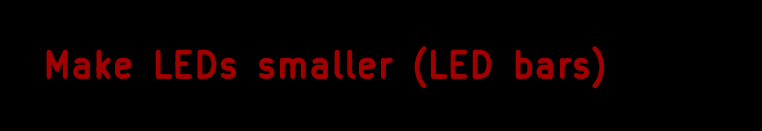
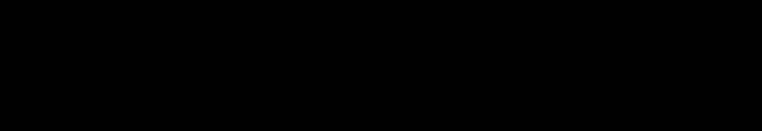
text: Make LEDs smaller (LED bars) (325, 67) -> none

